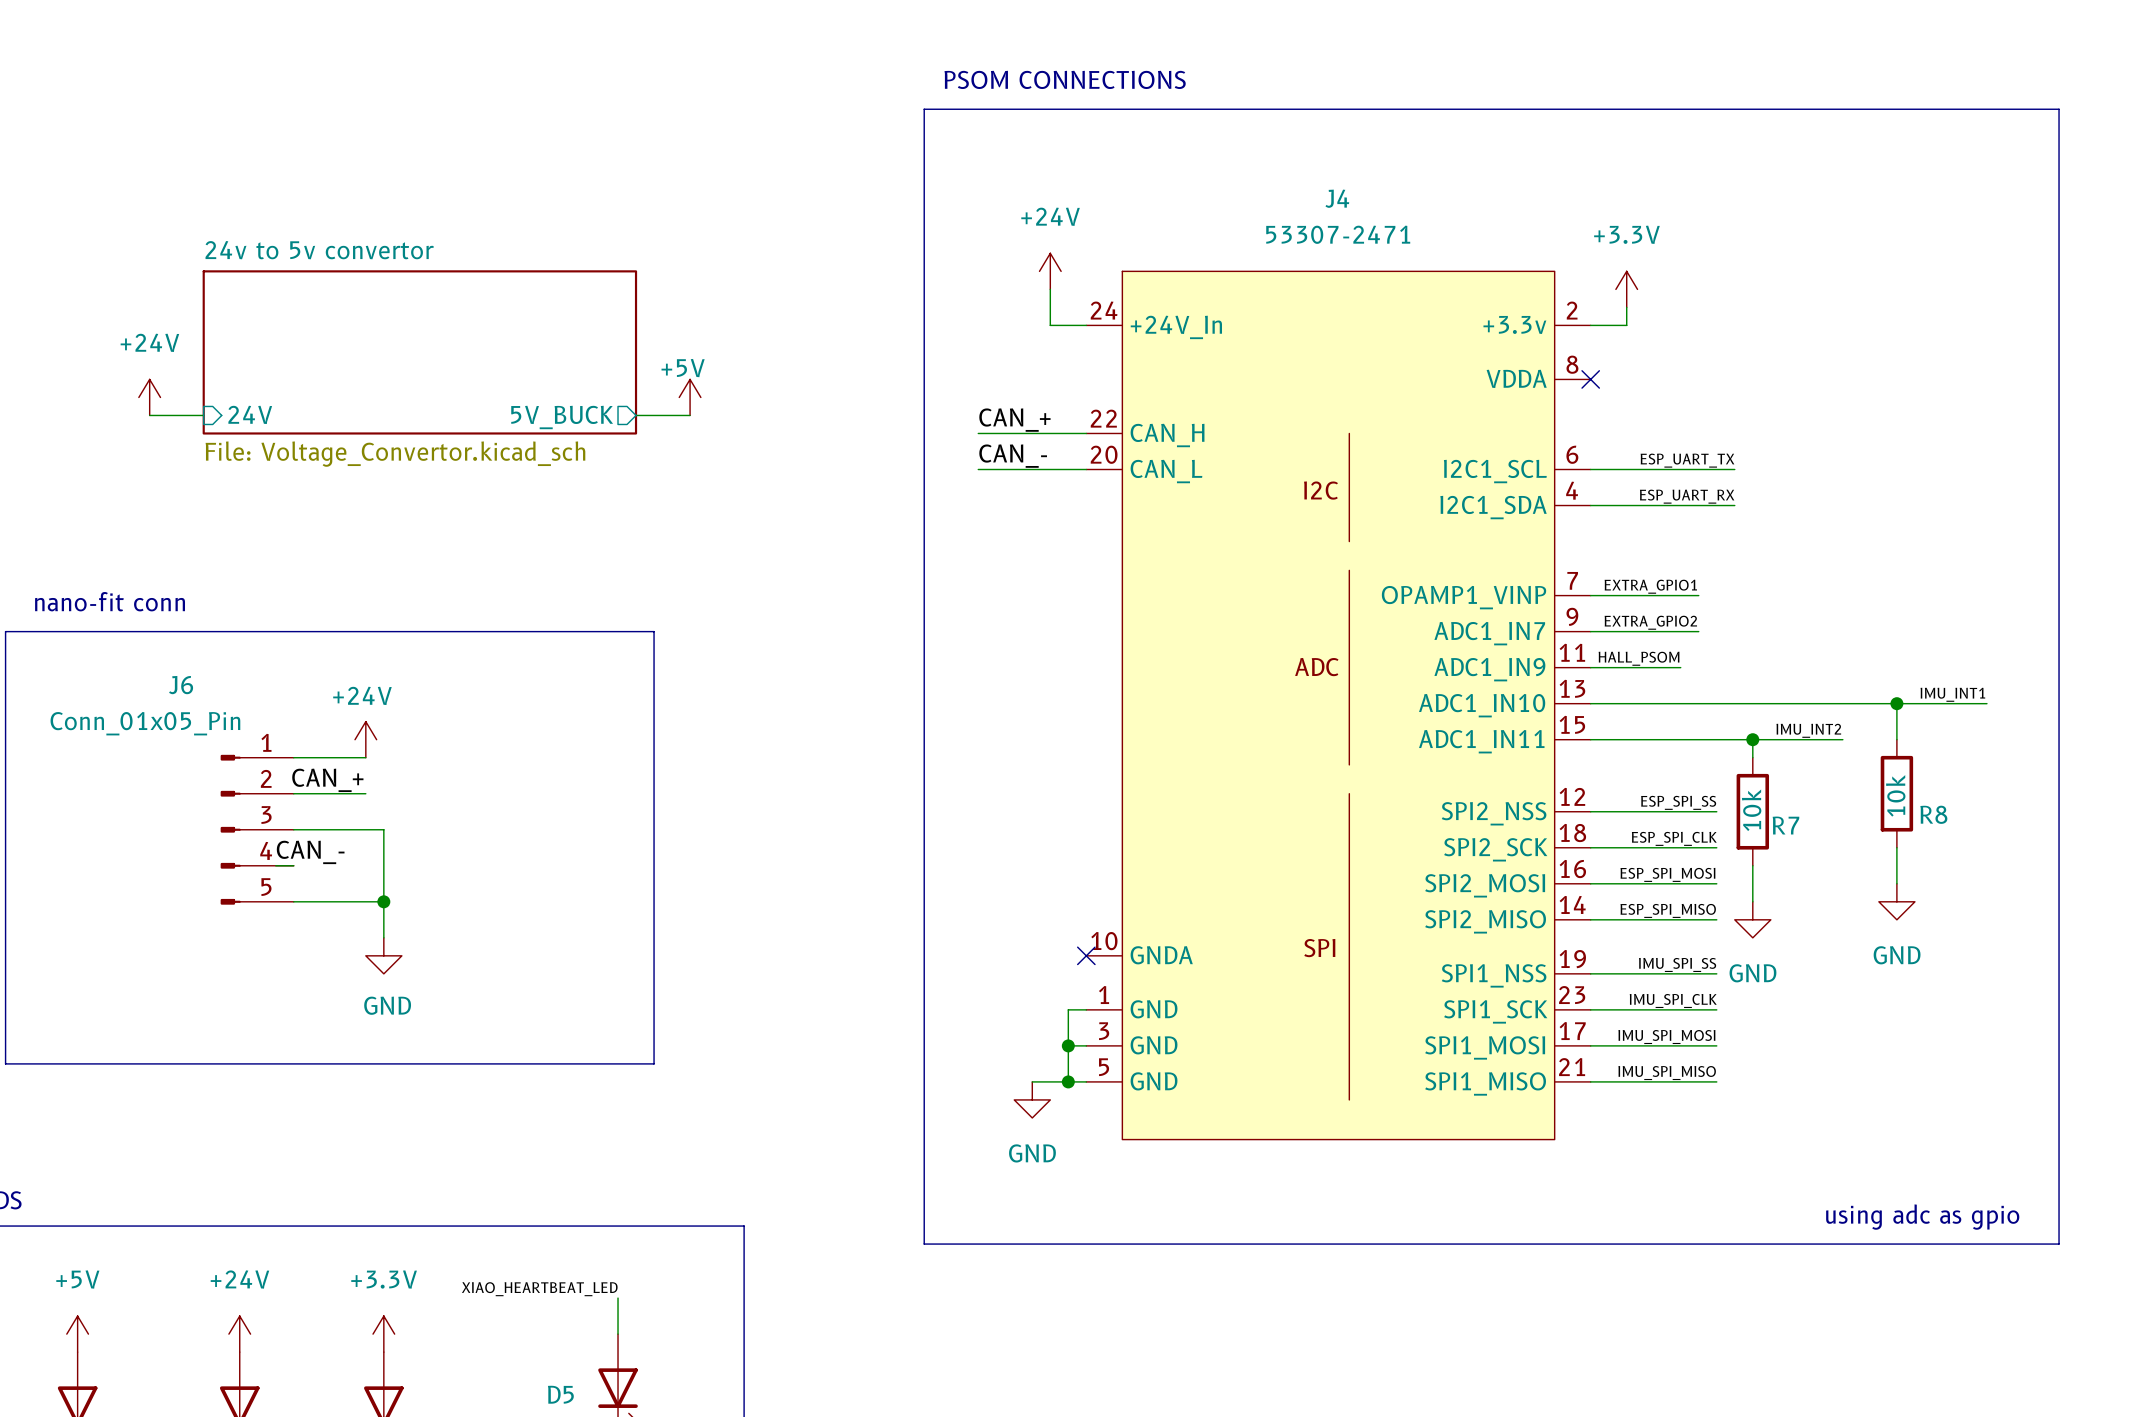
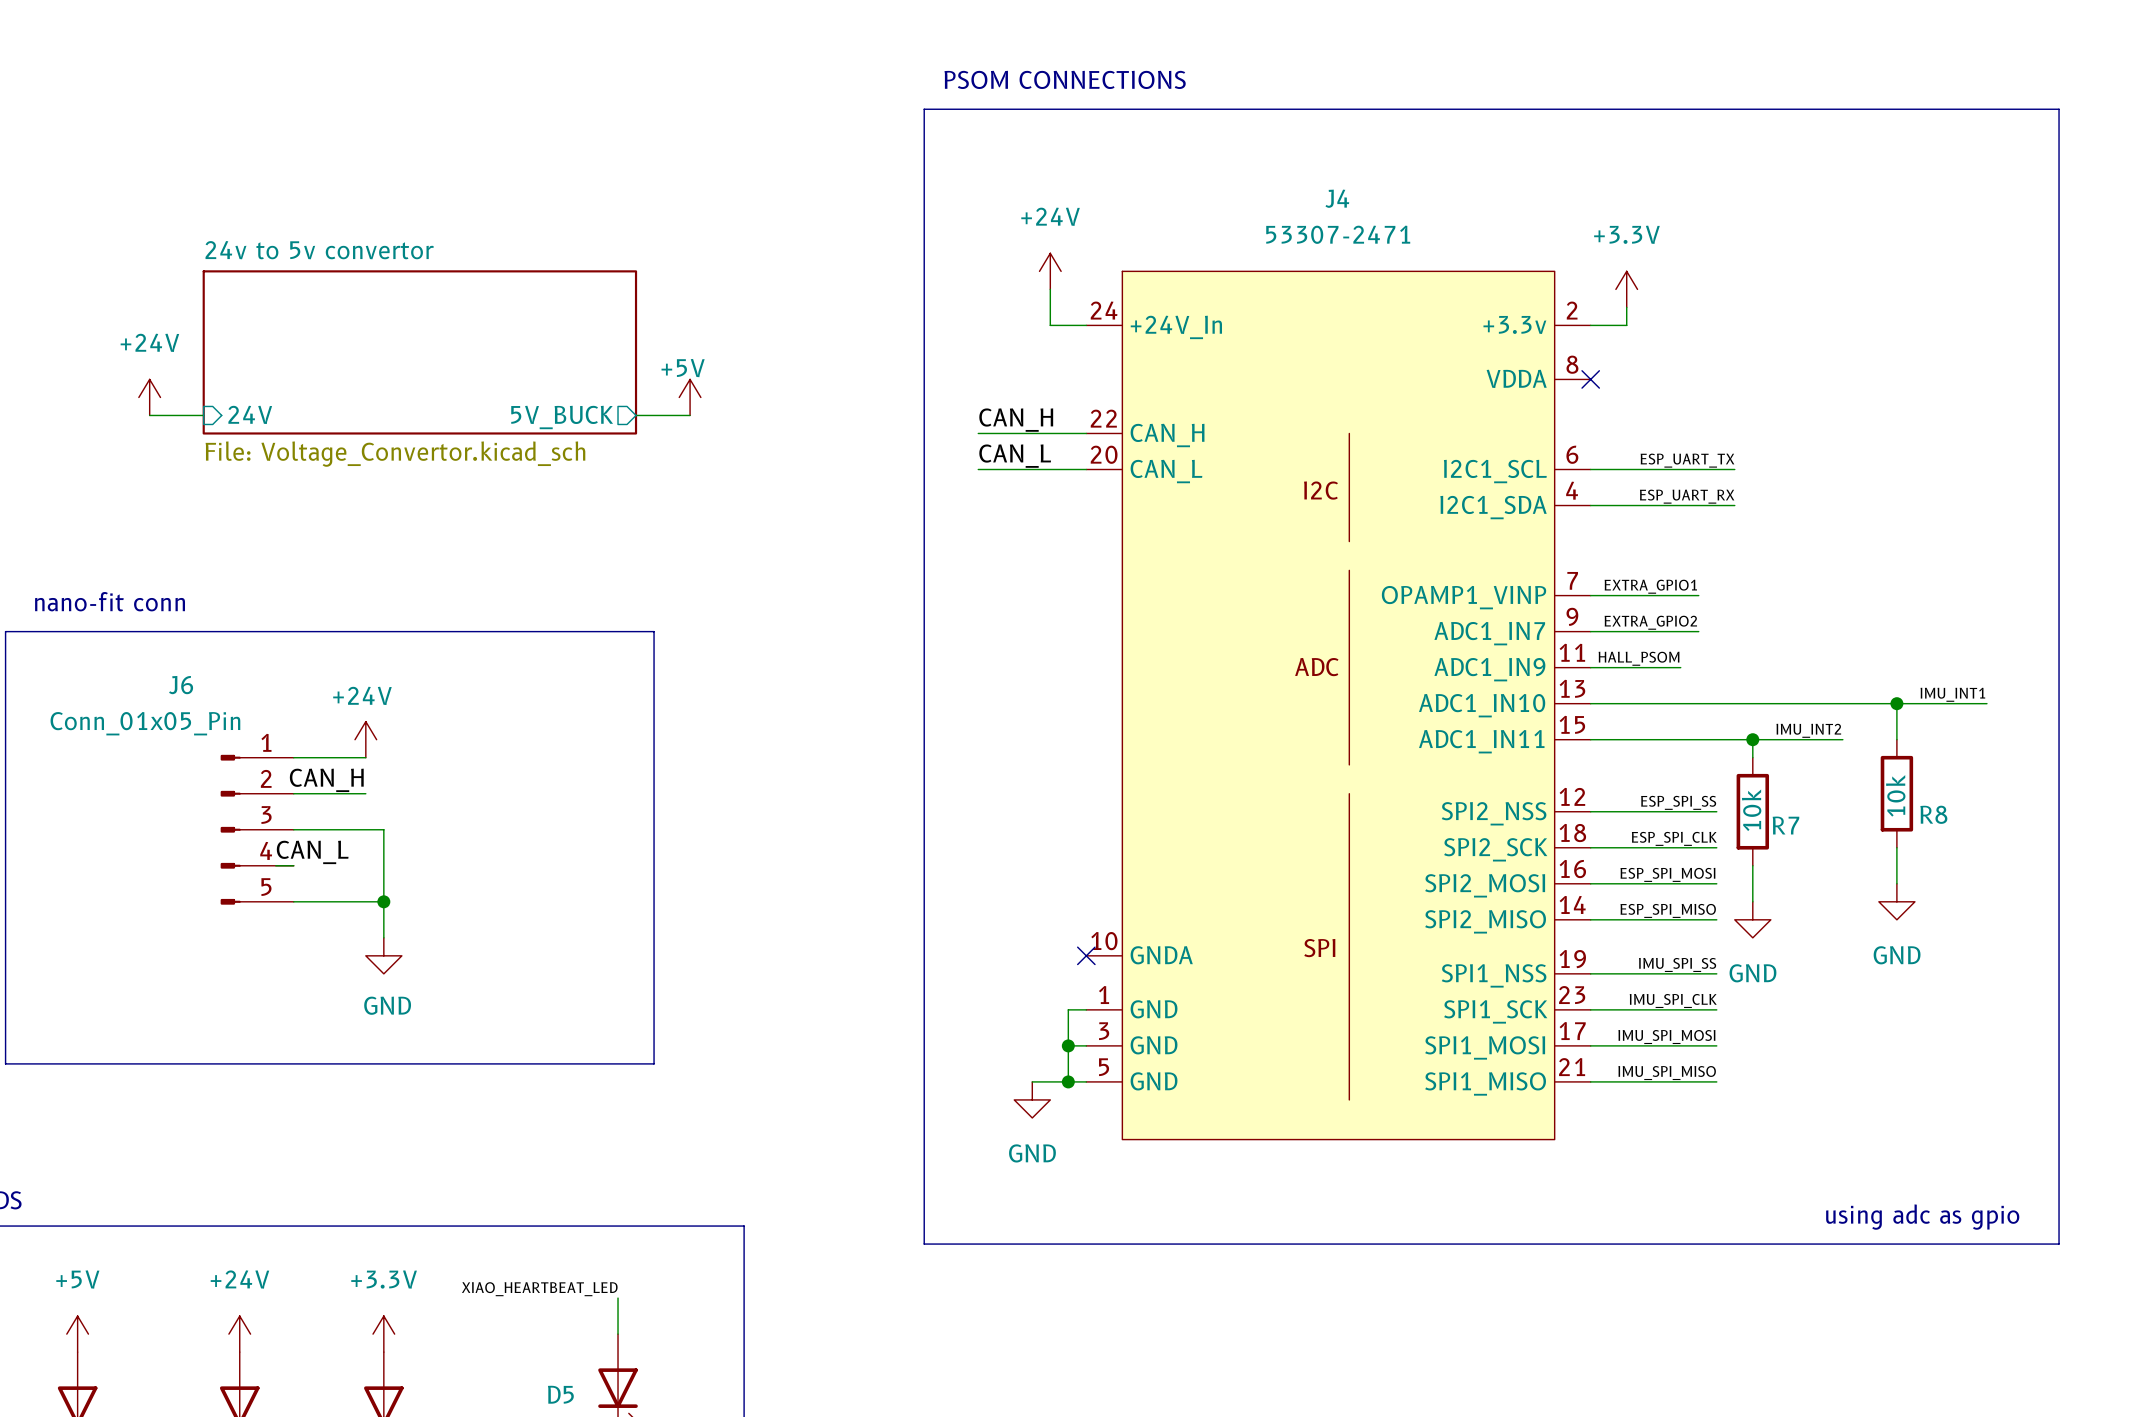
label: CAN_+ (1014, 420) -> CAN_H (1016, 420)
label: CAN_- (1013, 456) -> CAN_L (1015, 456)
label: CAN_+ (327, 780) -> CAN_H (326, 780)
label: CAN_- (310, 852) -> CAN_L (312, 852)

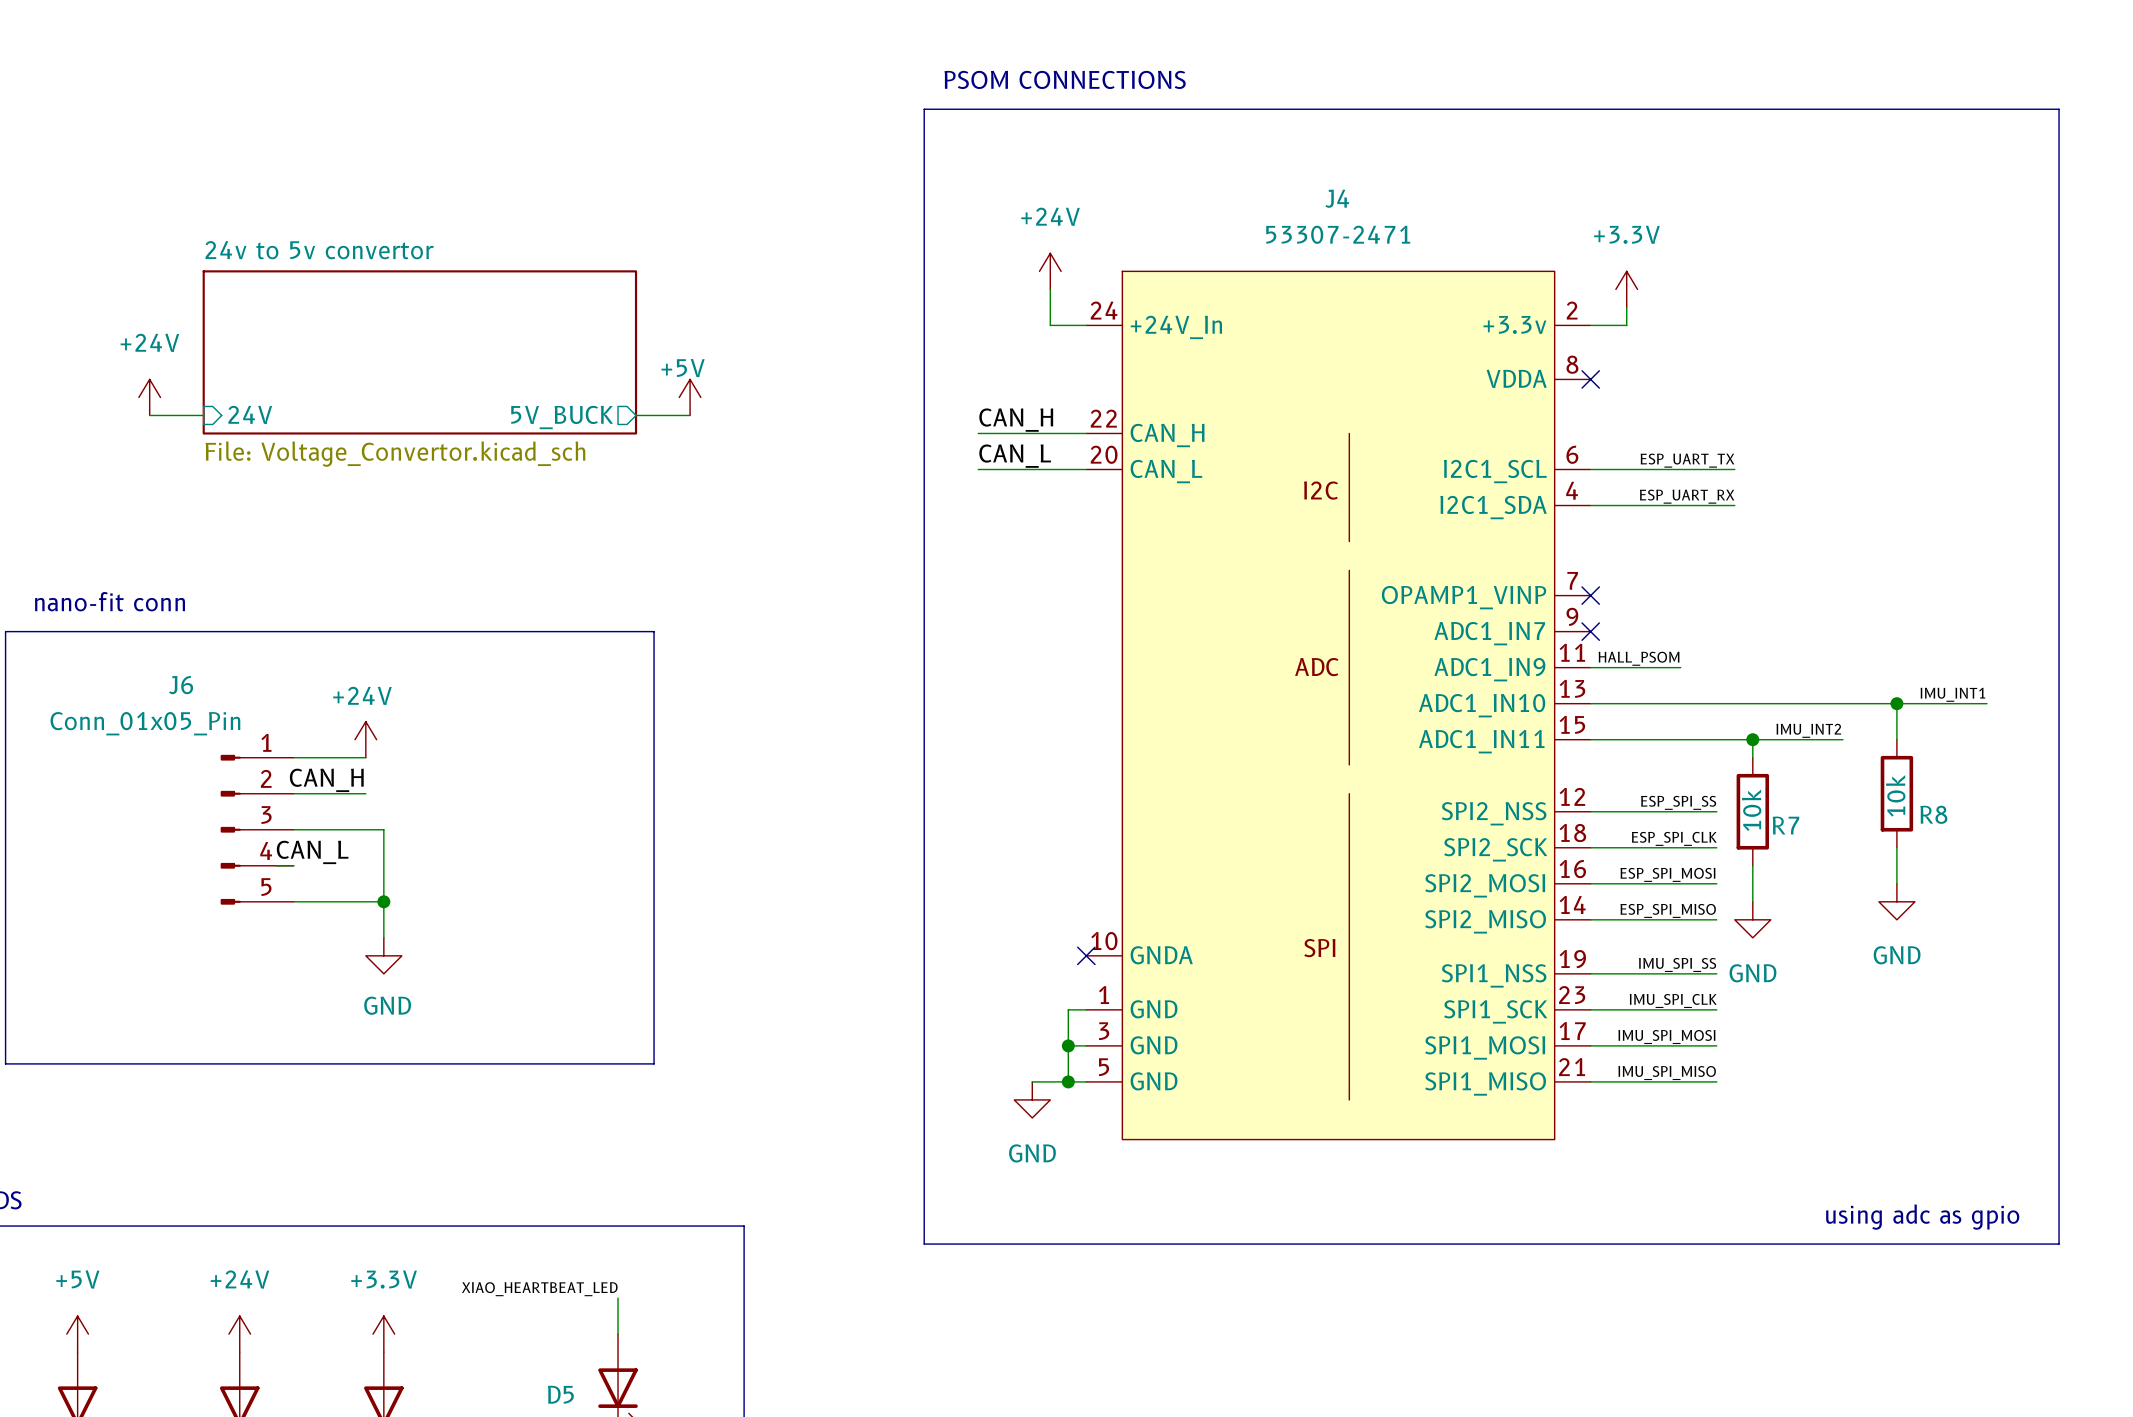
label: EXTRA_GPIO1 (1650, 586) -> none
wire: (1590, 595) (1698, 595) -> none
no-connect mark: none -> (1590, 595)
label: EXTRA_GPIO2 (1650, 622) -> none
wire: (1590, 631) (1698, 631) -> none
no-connect mark: none -> (1590, 631)

